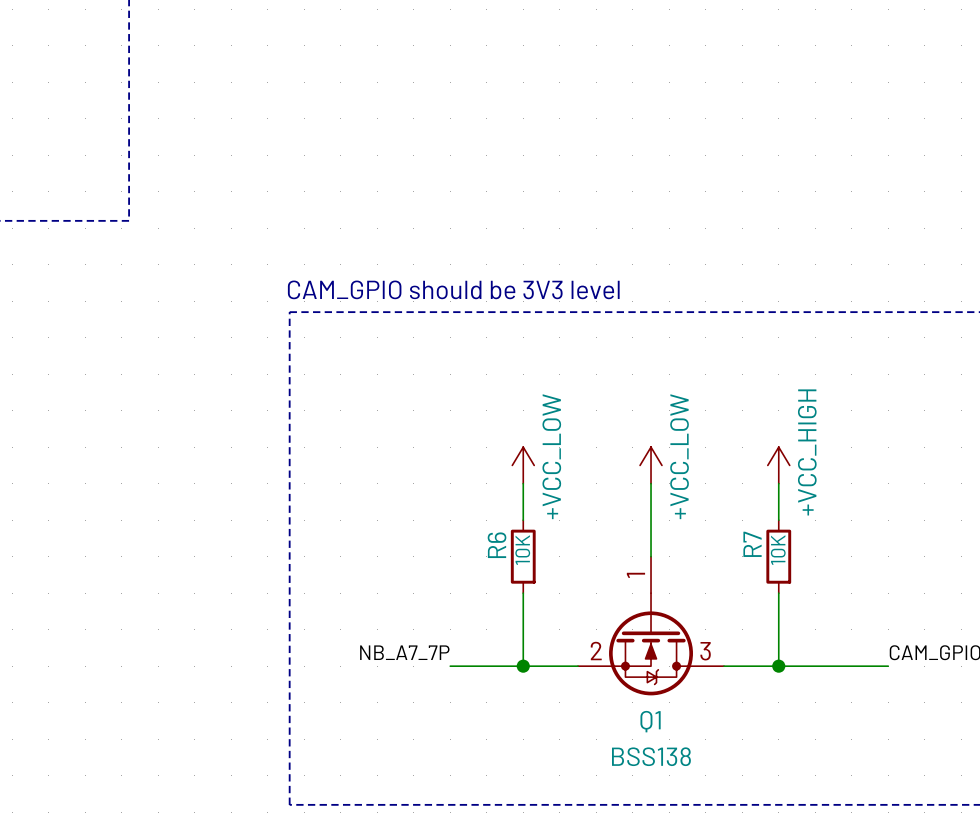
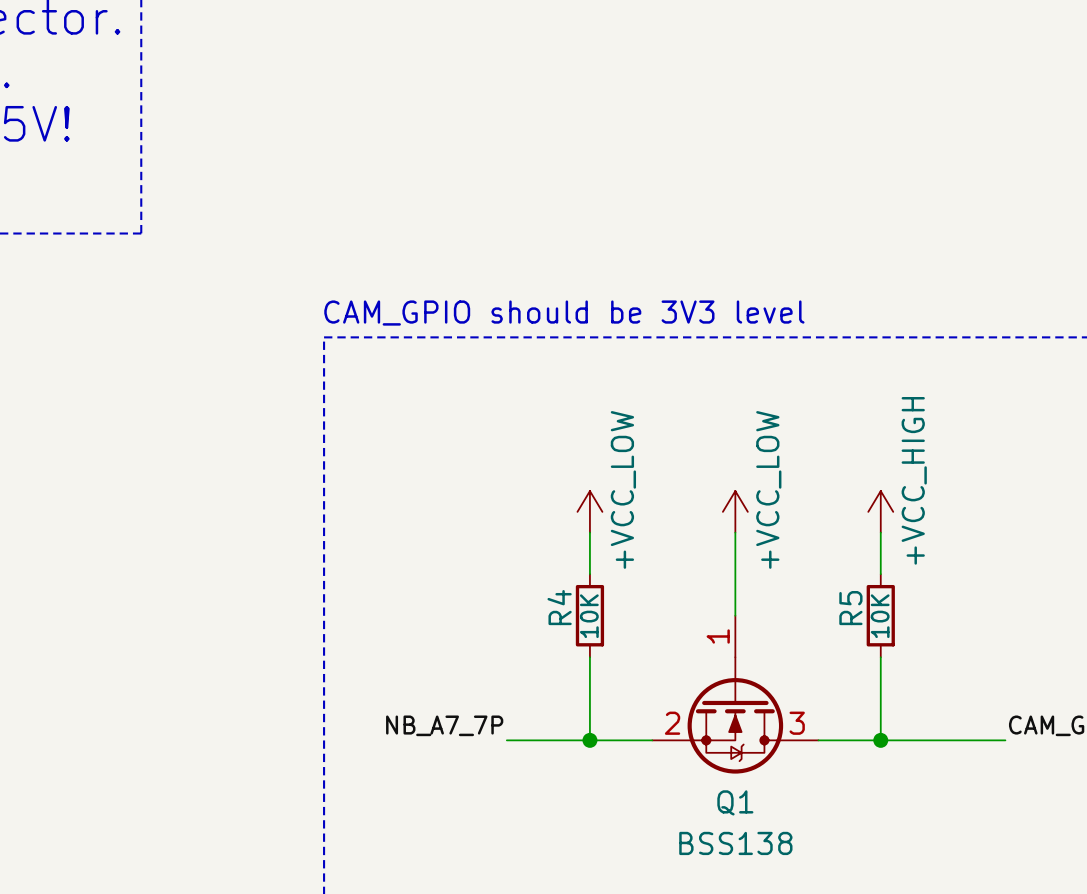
R7 name: R7 (752, 544) -> R5 (850, 608)
R6 name: R6 (497, 545) -> R4 (559, 607)

